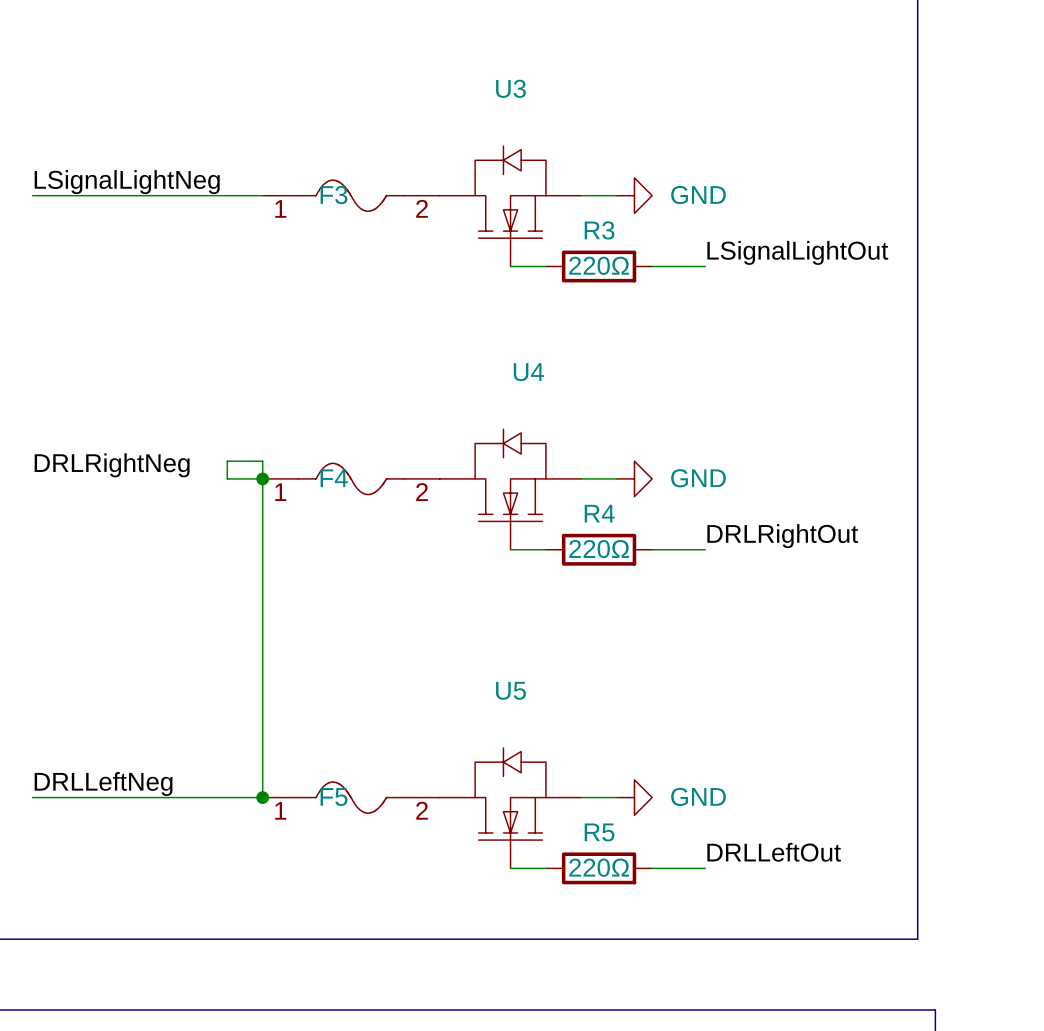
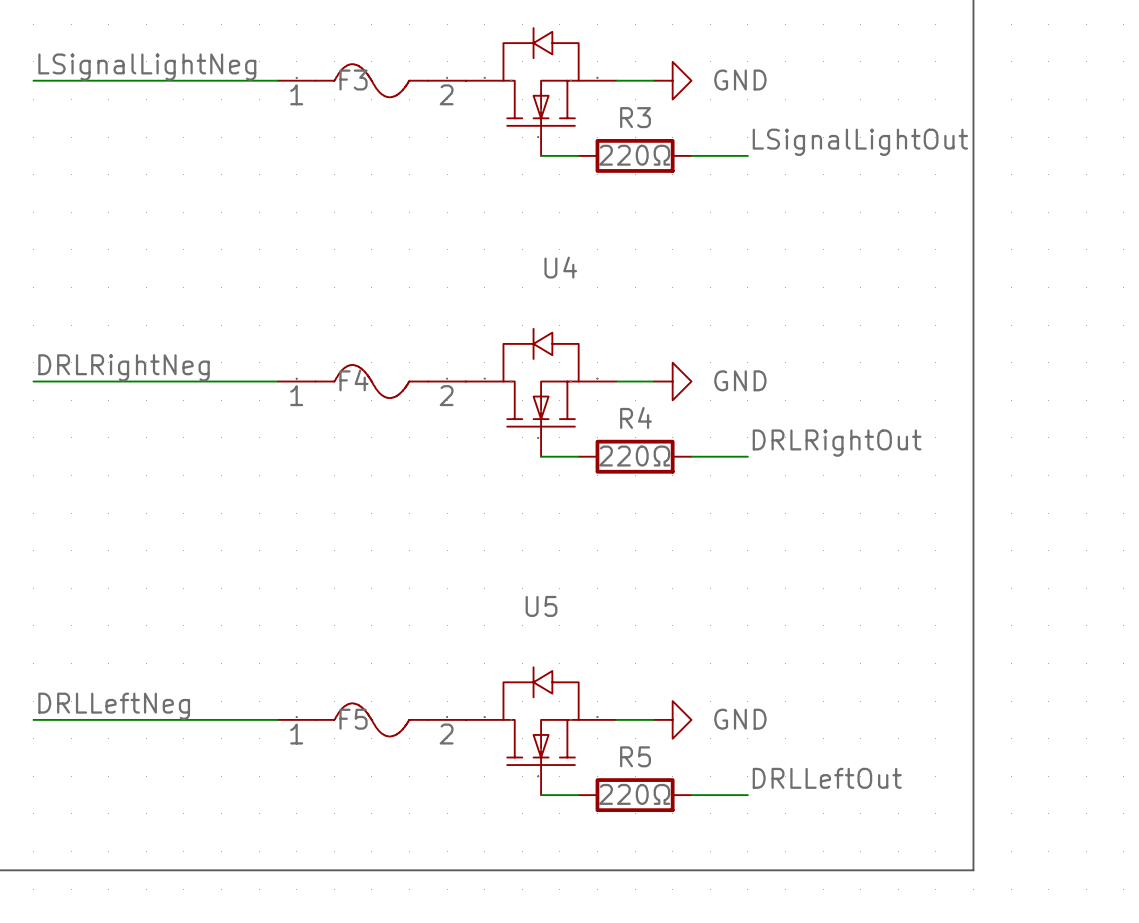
wire: (227, 478) (227, 461) (262, 461) (262, 797) -> (240, 381) (33, 381)
junction: (262, 478) -> none
junction: (262, 797) -> none

